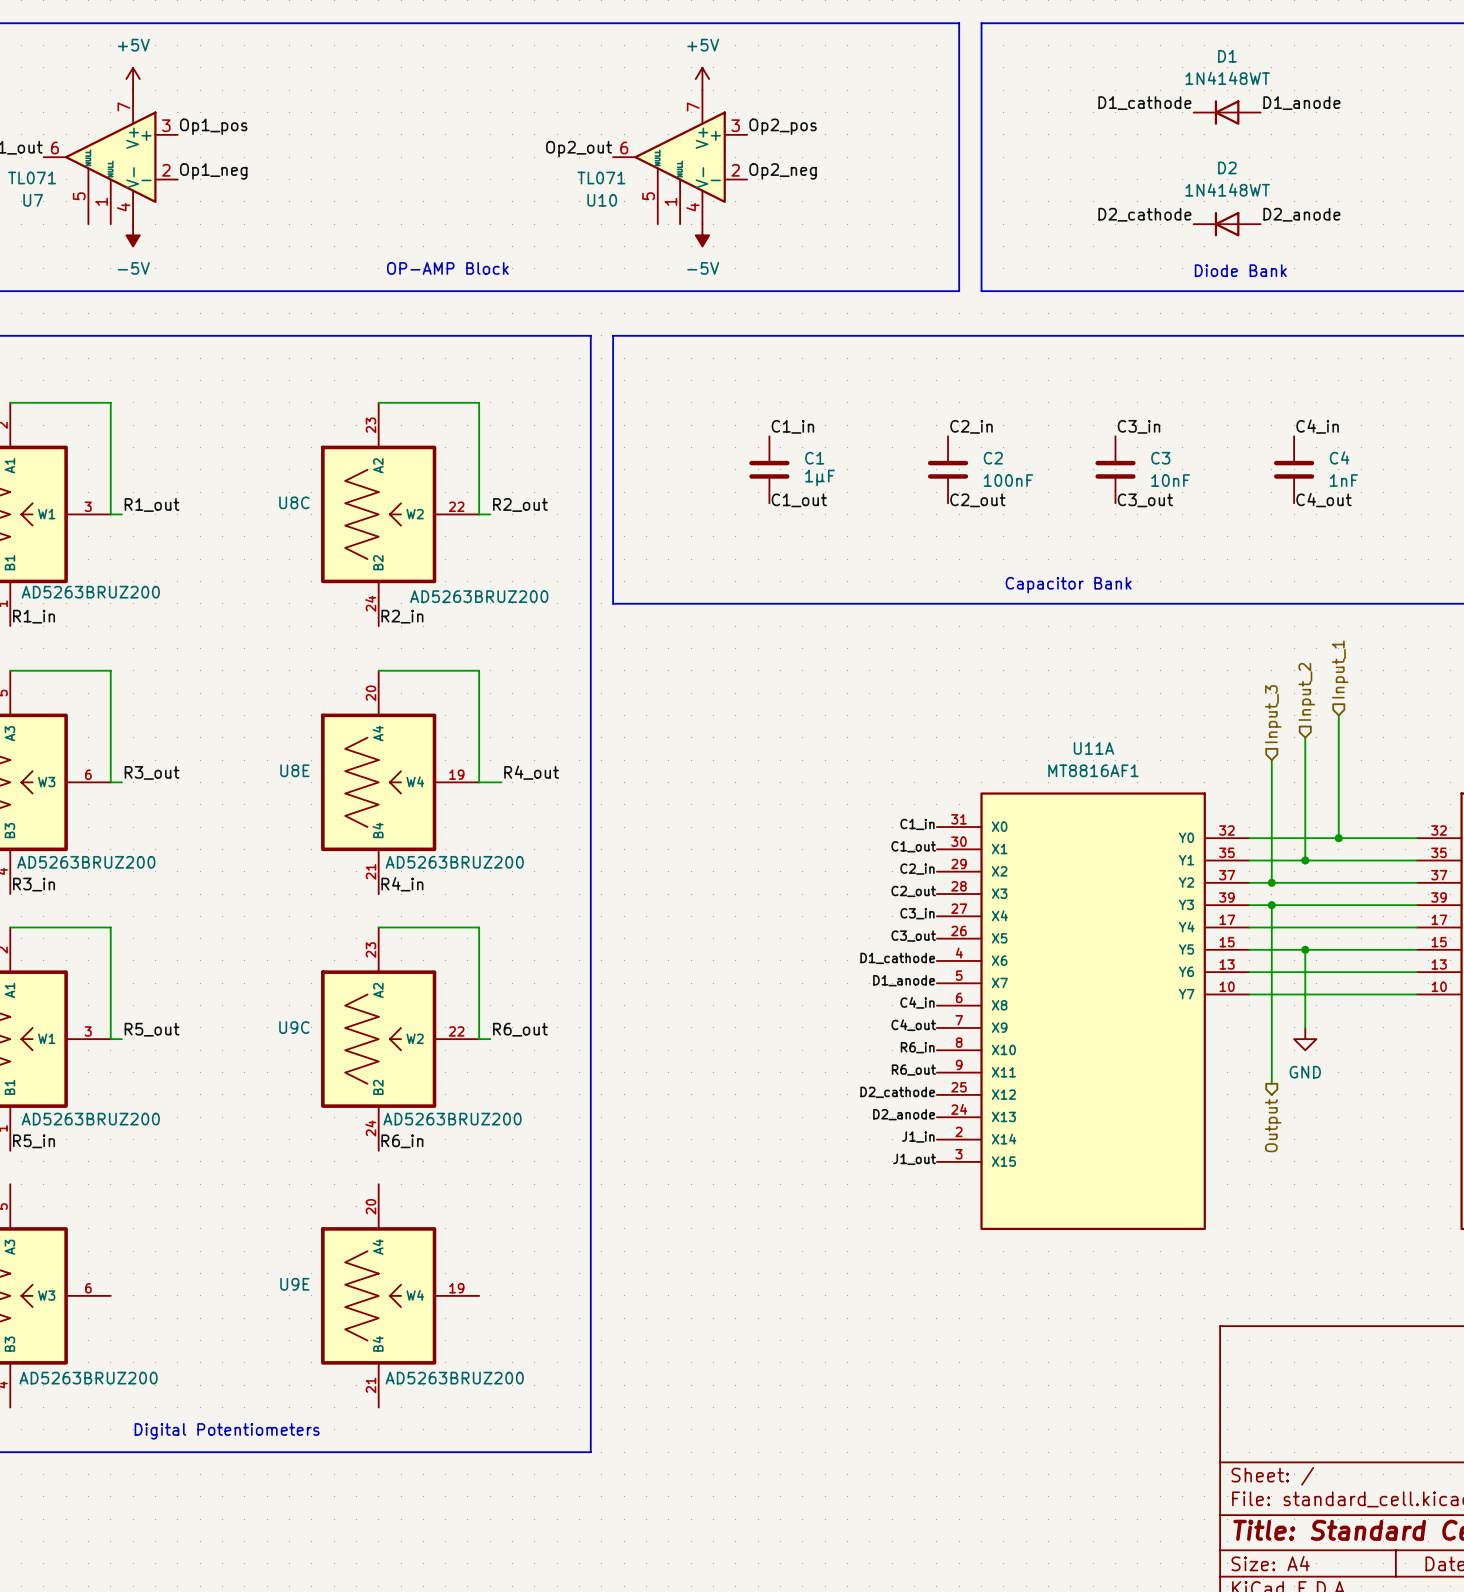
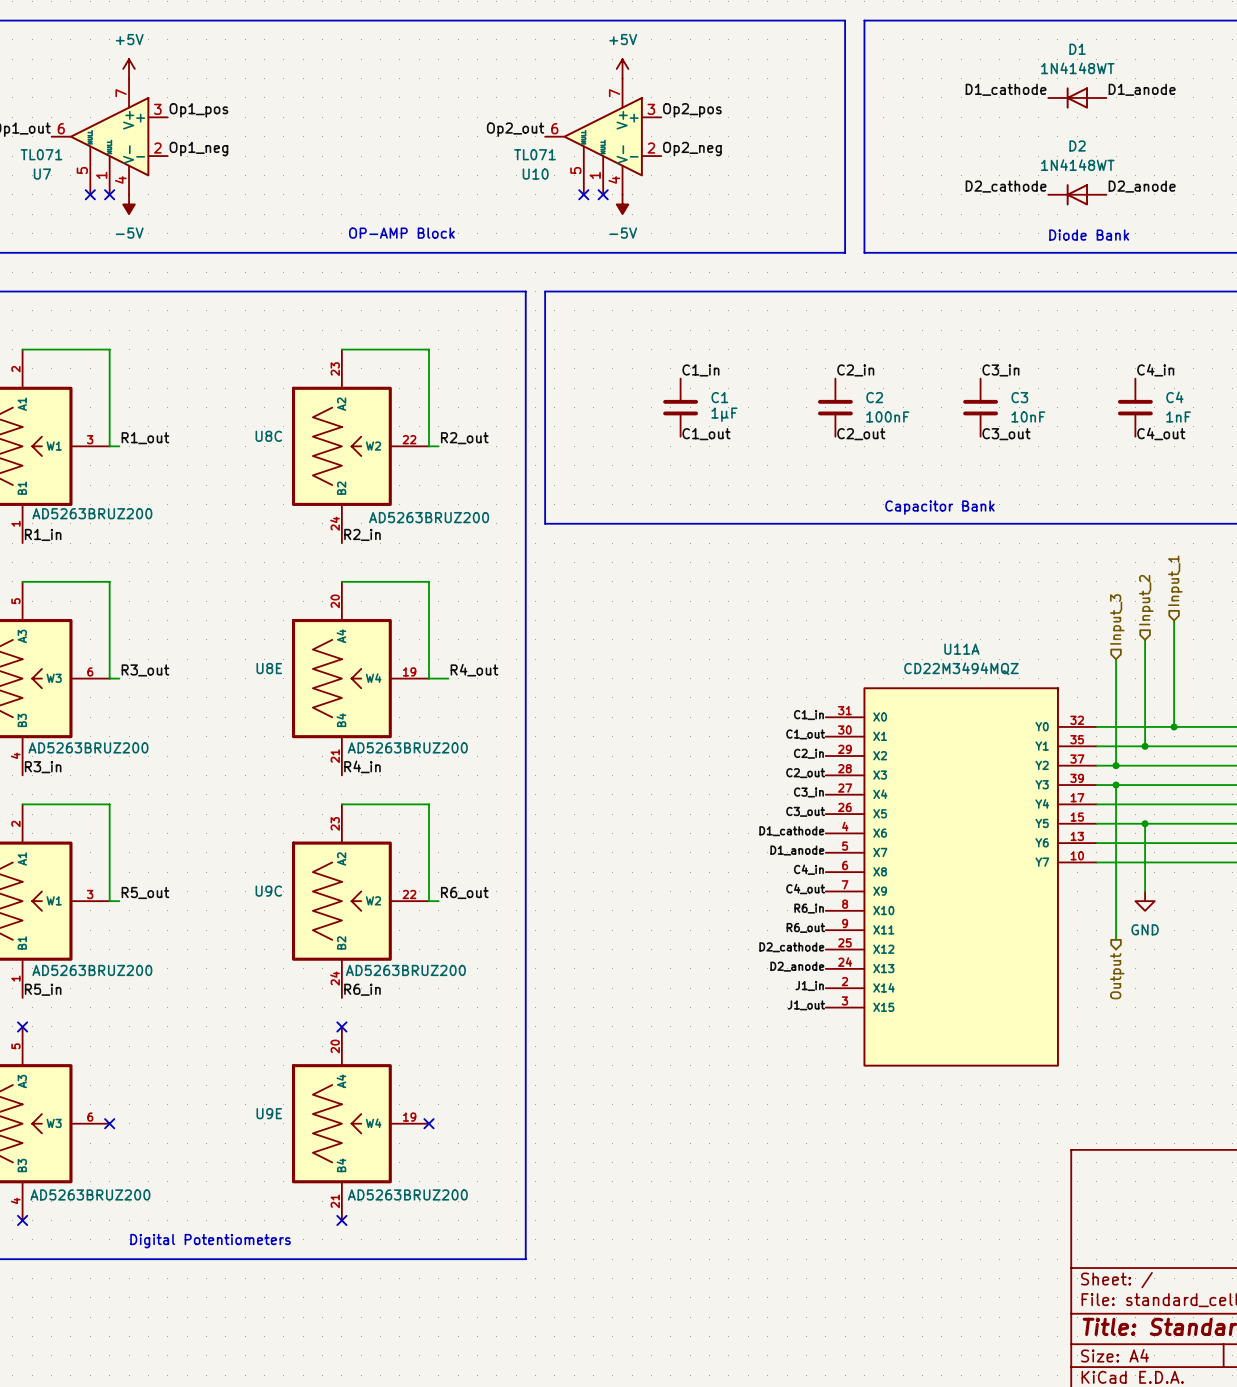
no-connect mark: none -> (90, 194)
no-connect mark: none -> (109, 194)
no-connect mark: none -> (583, 194)
no-connect mark: none -> (603, 194)
U11A value: MT8816AF1 (1093, 770) -> CD22M3494MQZ (961, 668)
no-connect mark: none -> (22, 1026)
no-connect mark: none -> (341, 1026)
no-connect mark: none -> (109, 1123)
no-connect mark: none -> (428, 1123)
no-connect mark: none -> (22, 1220)
no-connect mark: none -> (341, 1220)

